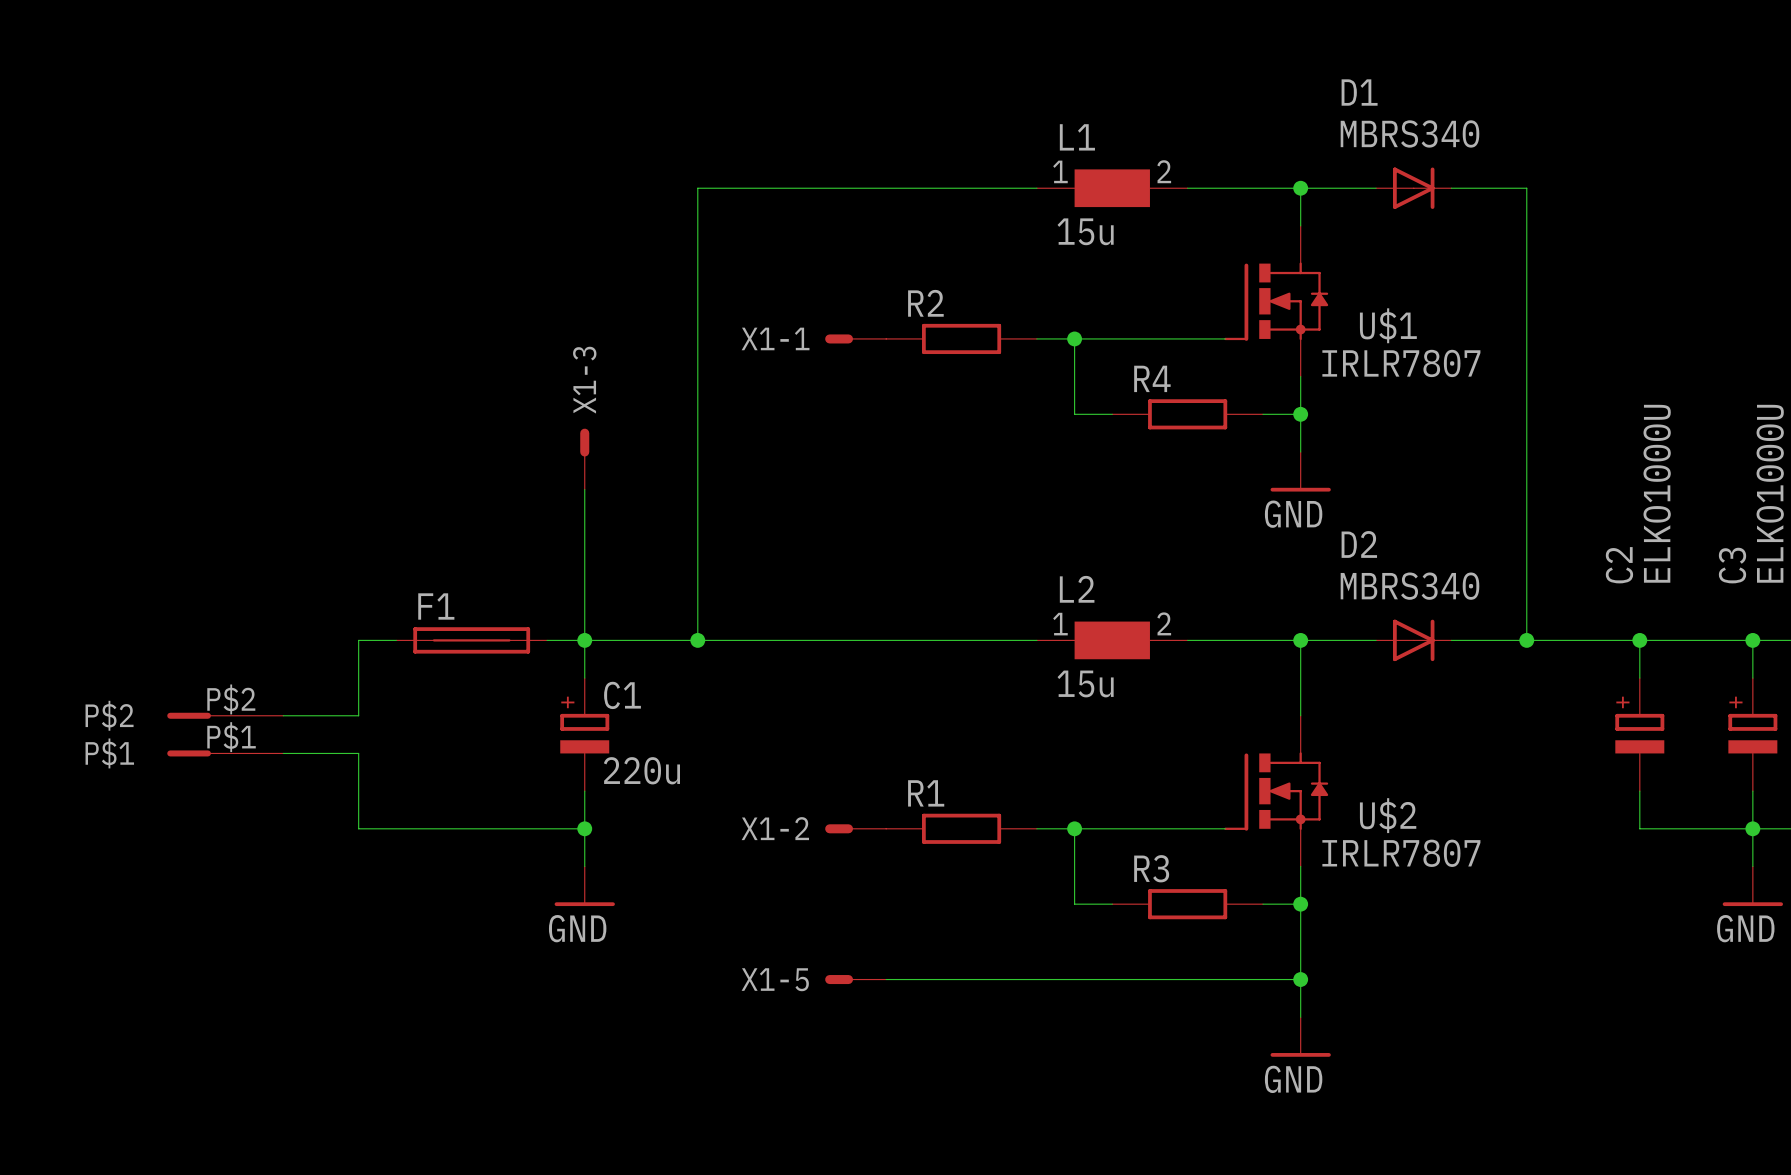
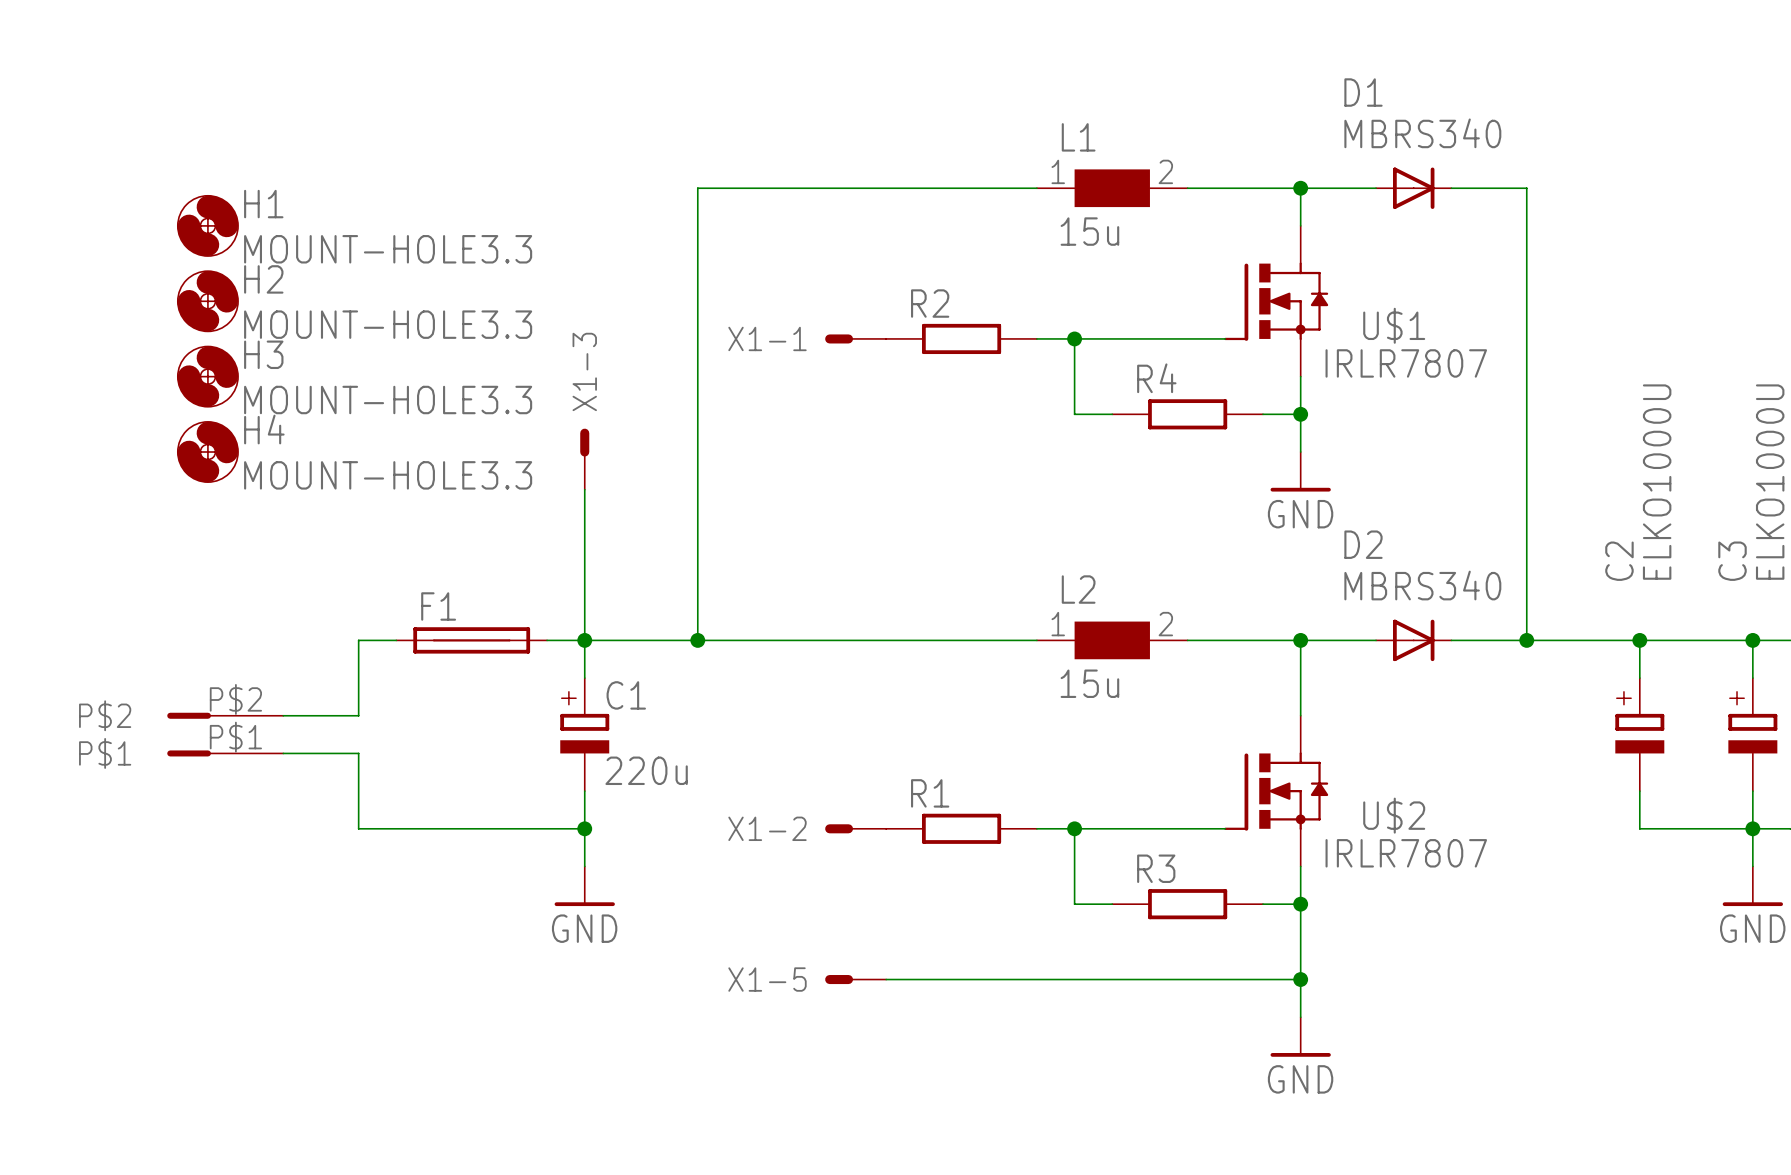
H1: none -> MOUNT-HOLE3.3 (207, 225)
H2: none -> MOUNT-HOLE3.3 (207, 301)
H3: none -> MOUNT-HOLE3.3 (207, 376)
H4: none -> MOUNT-HOLE3.3 (207, 452)

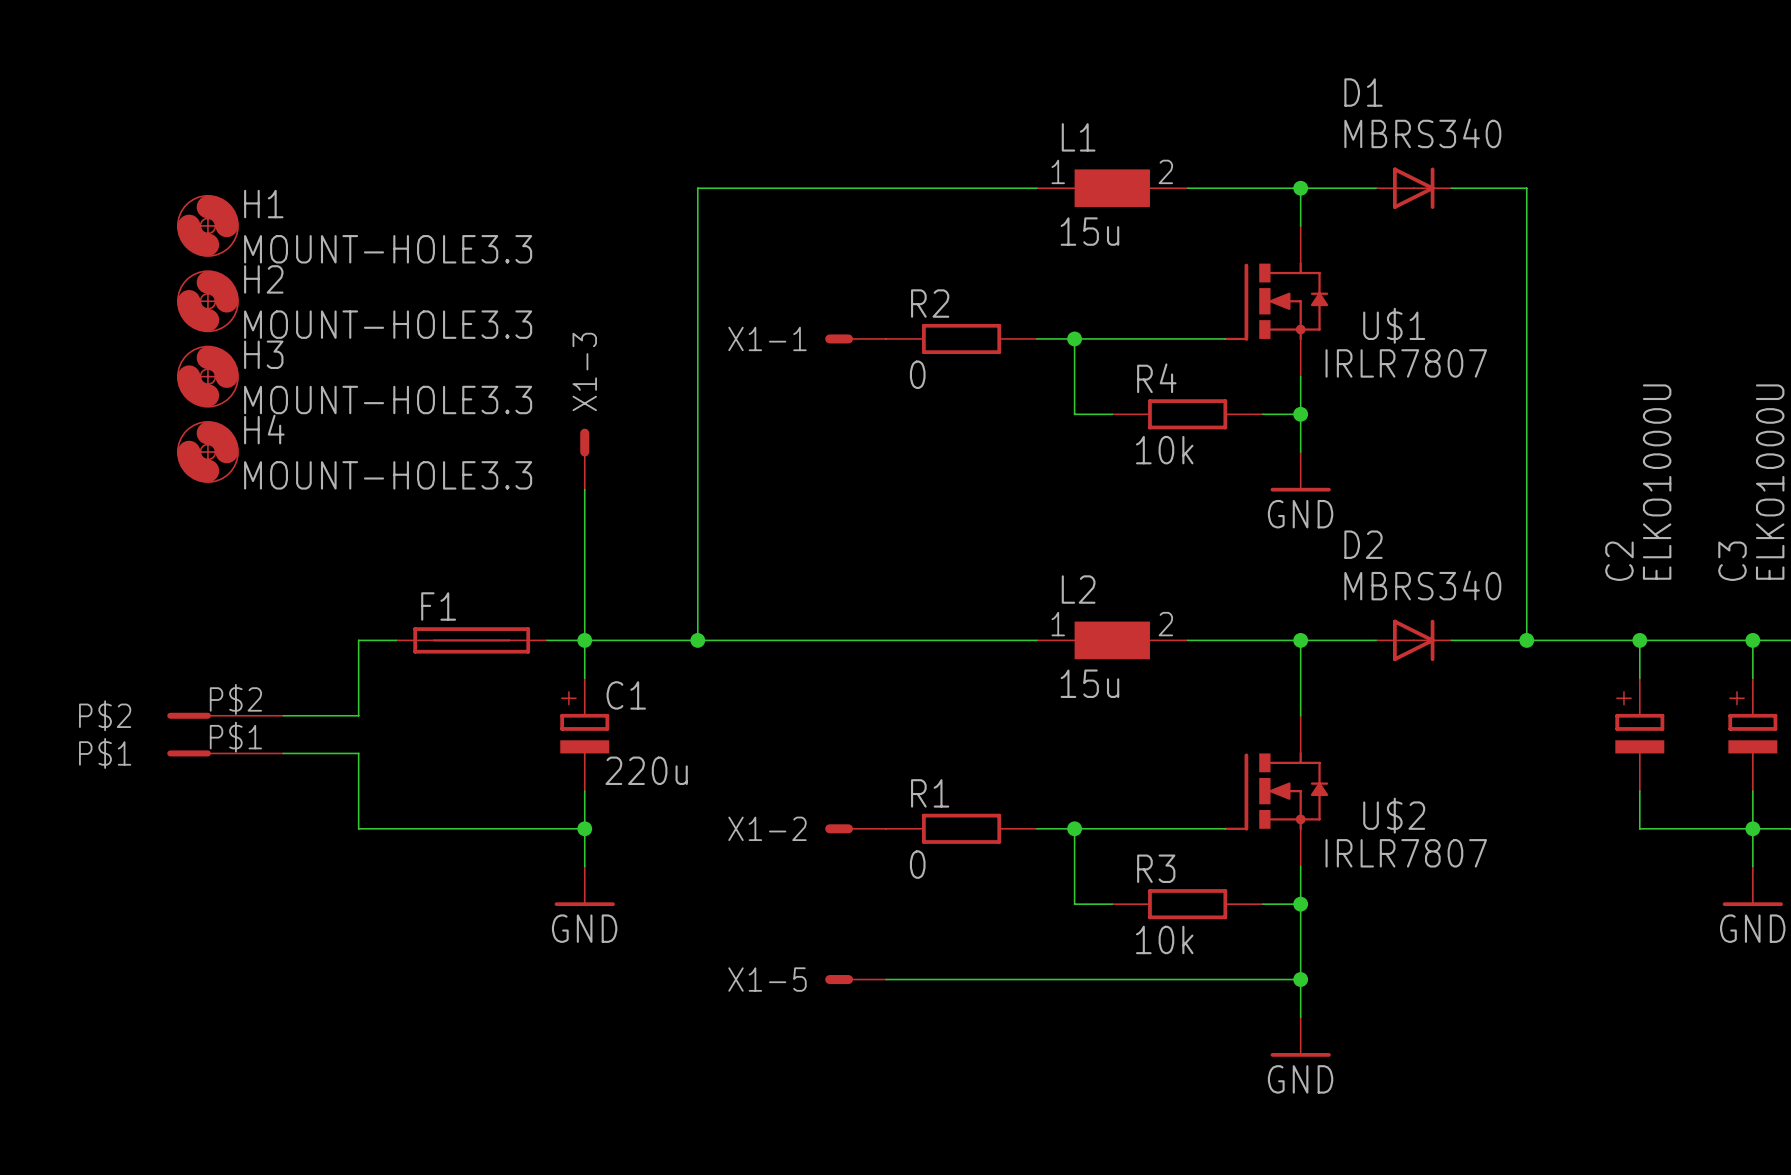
R2 value: none -> 0 (917, 374)
R4 value: none -> 10k (1164, 450)
R1 value: none -> 0 (917, 864)
R3 value: none -> 10k (1164, 939)

